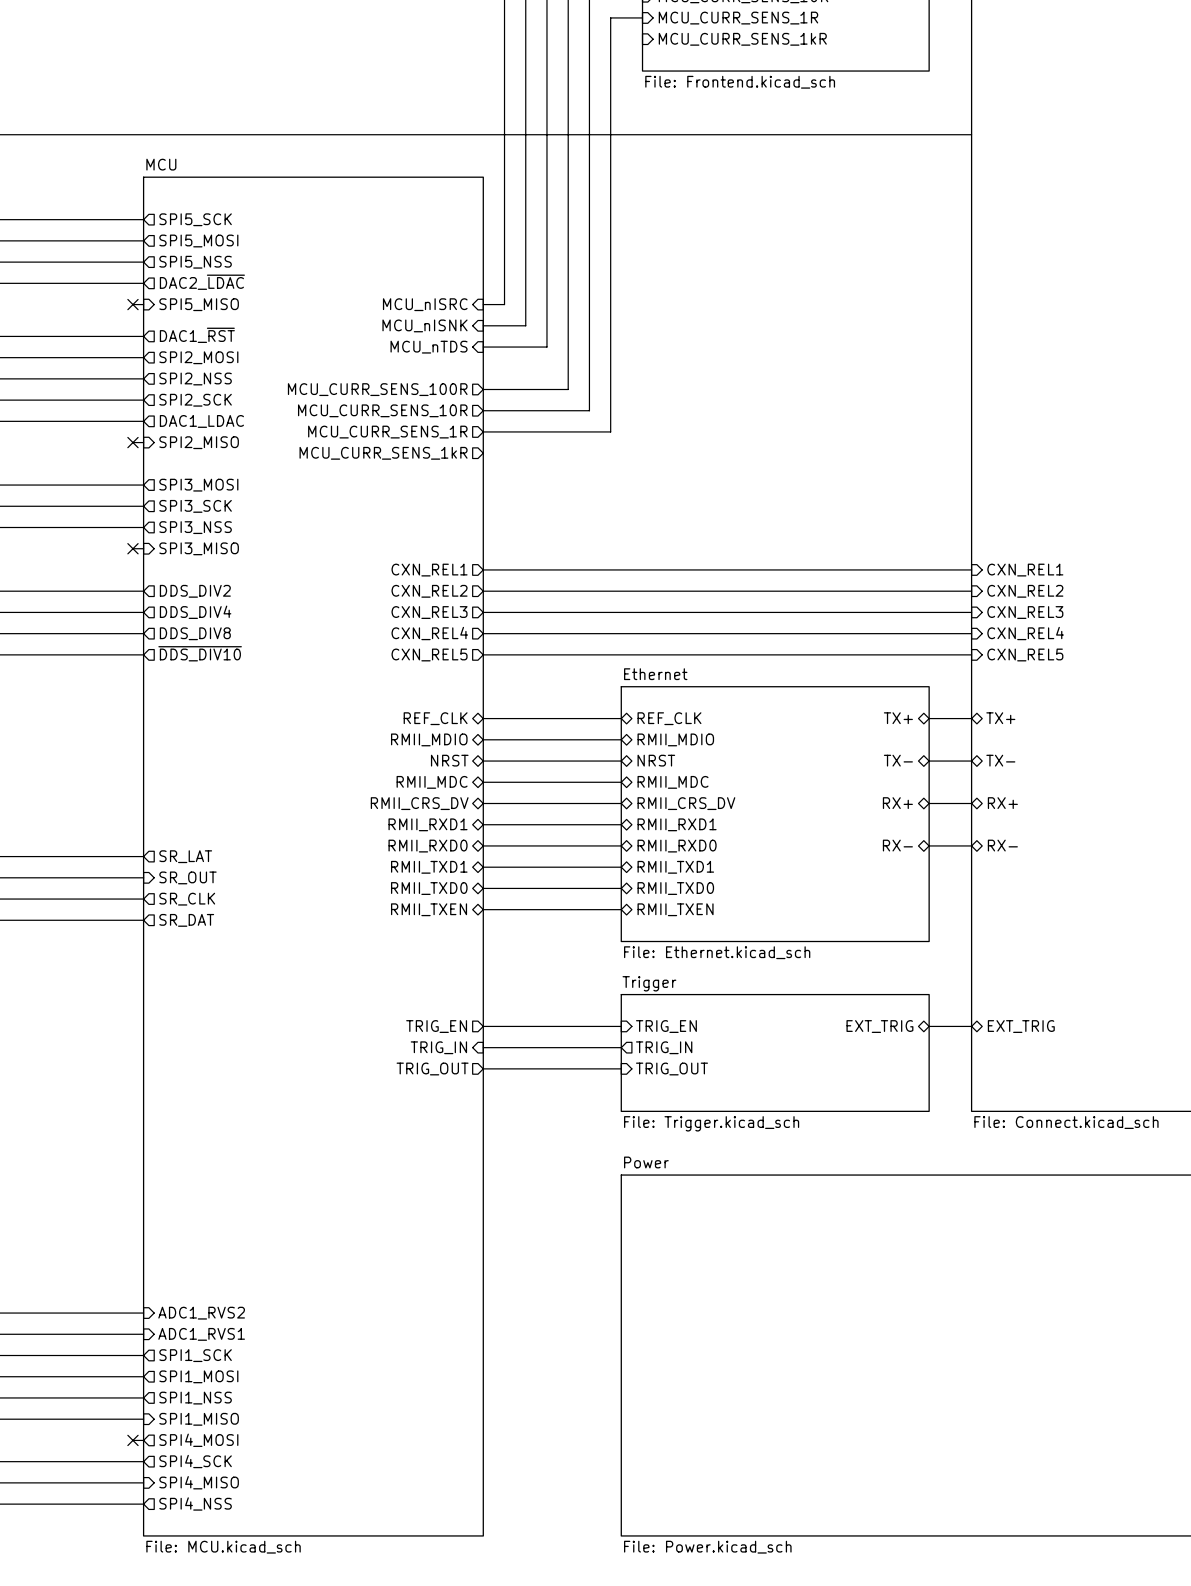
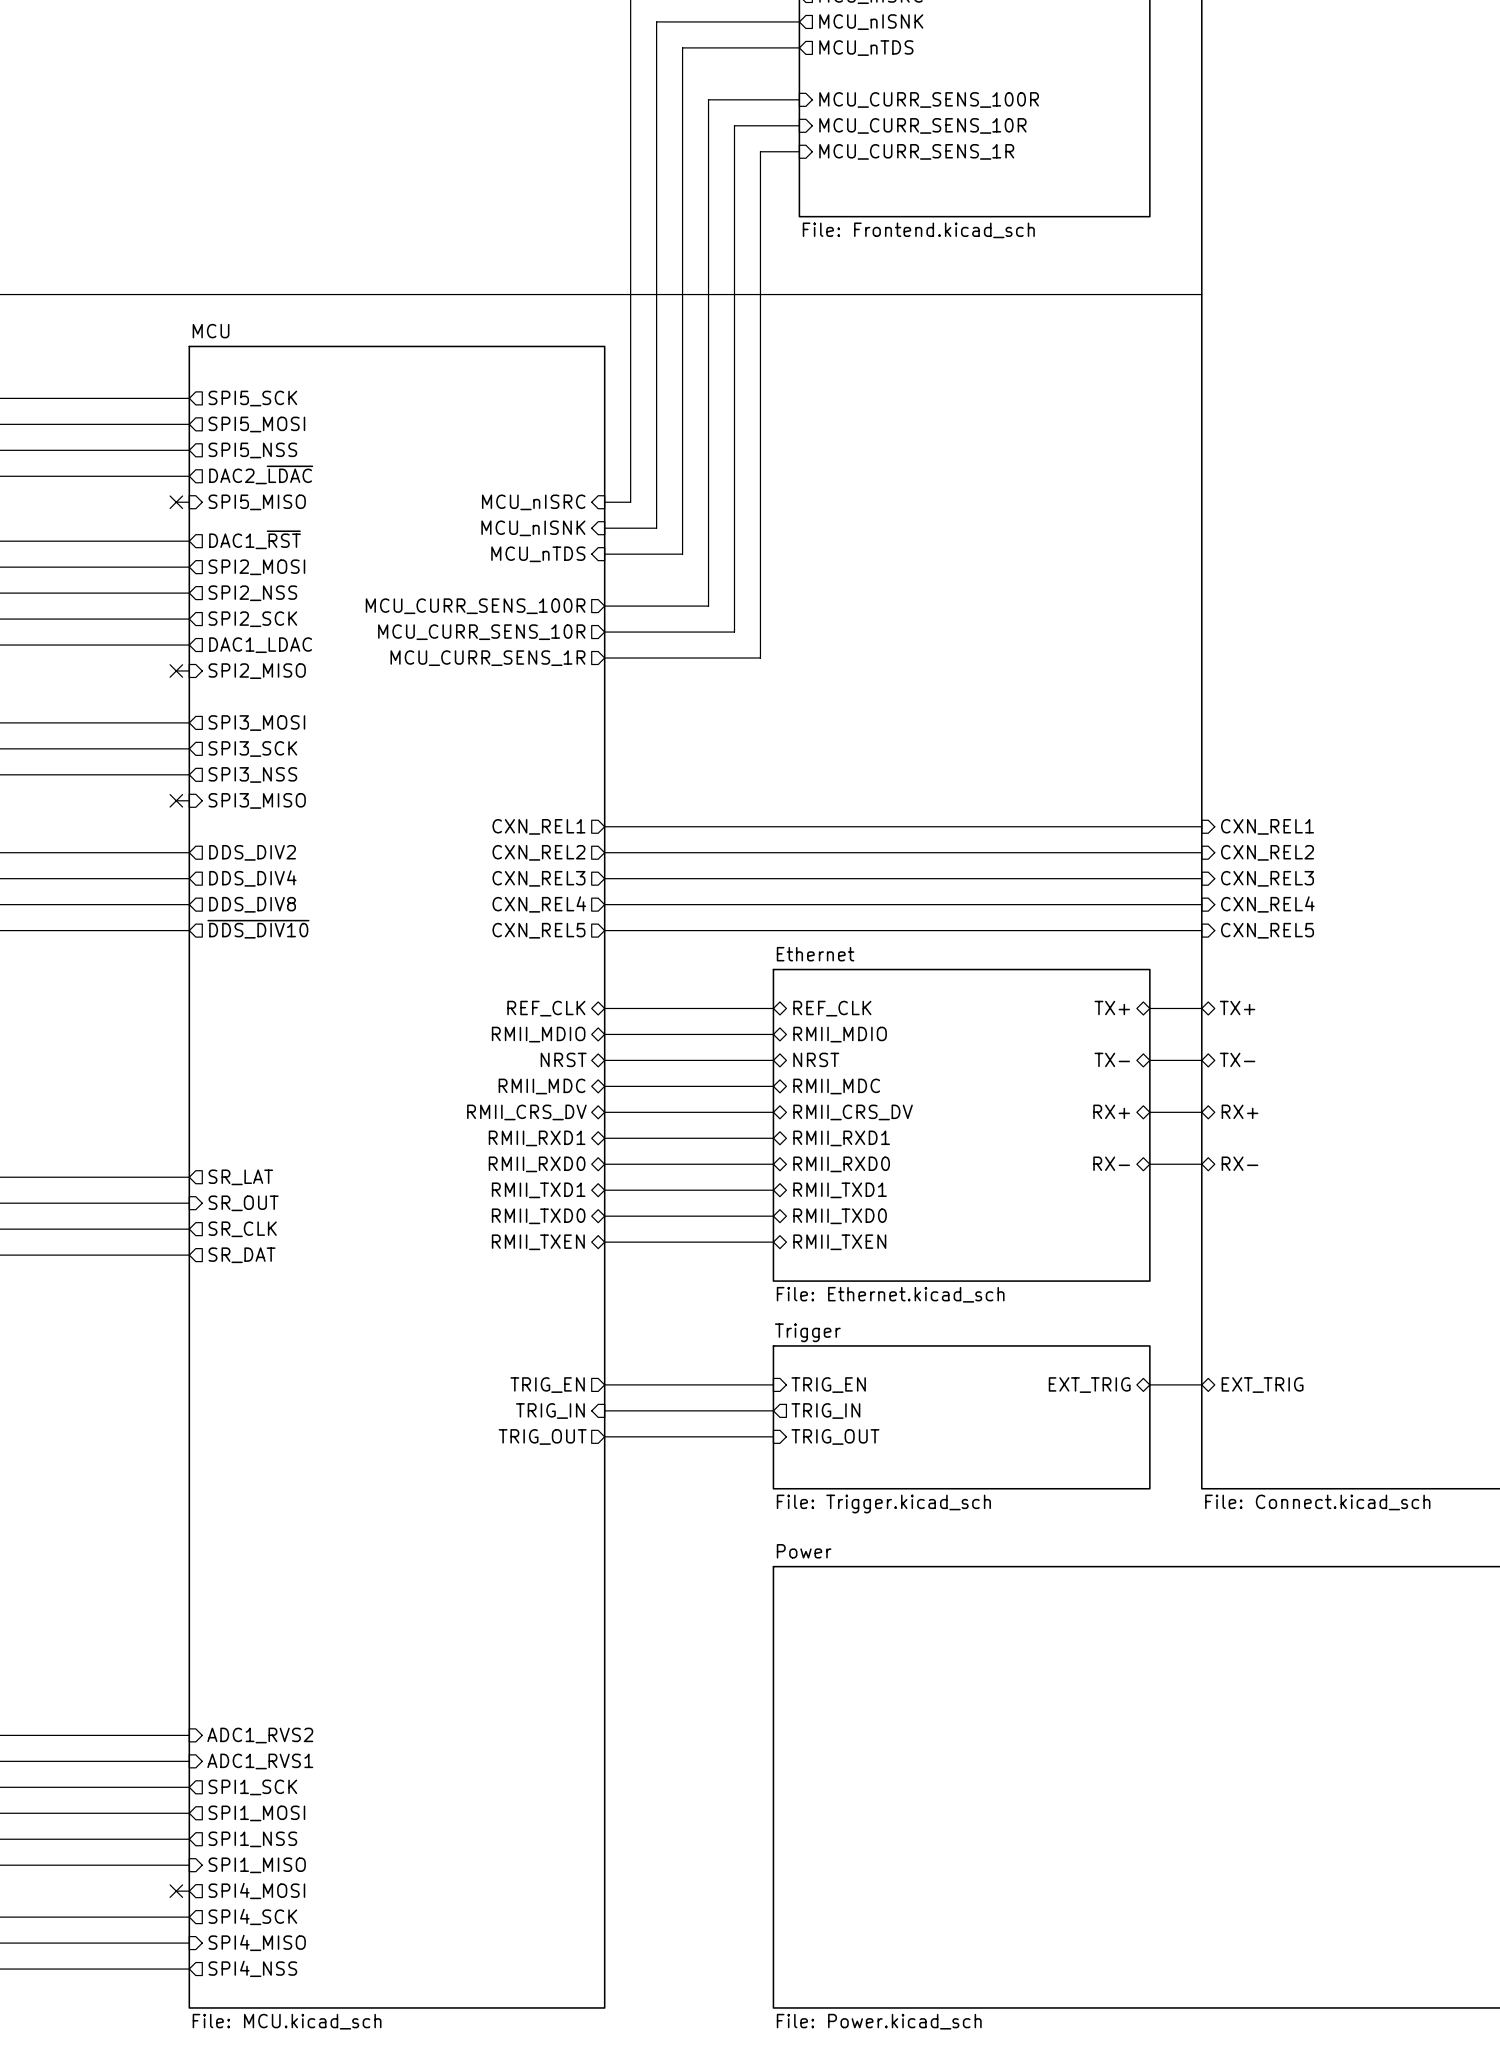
sheet pin: MCU_CURR_SENS_1kR (742, 39) -> none
sheet pin: MCU_CURR_SENS_1kR (383, 453) -> none

